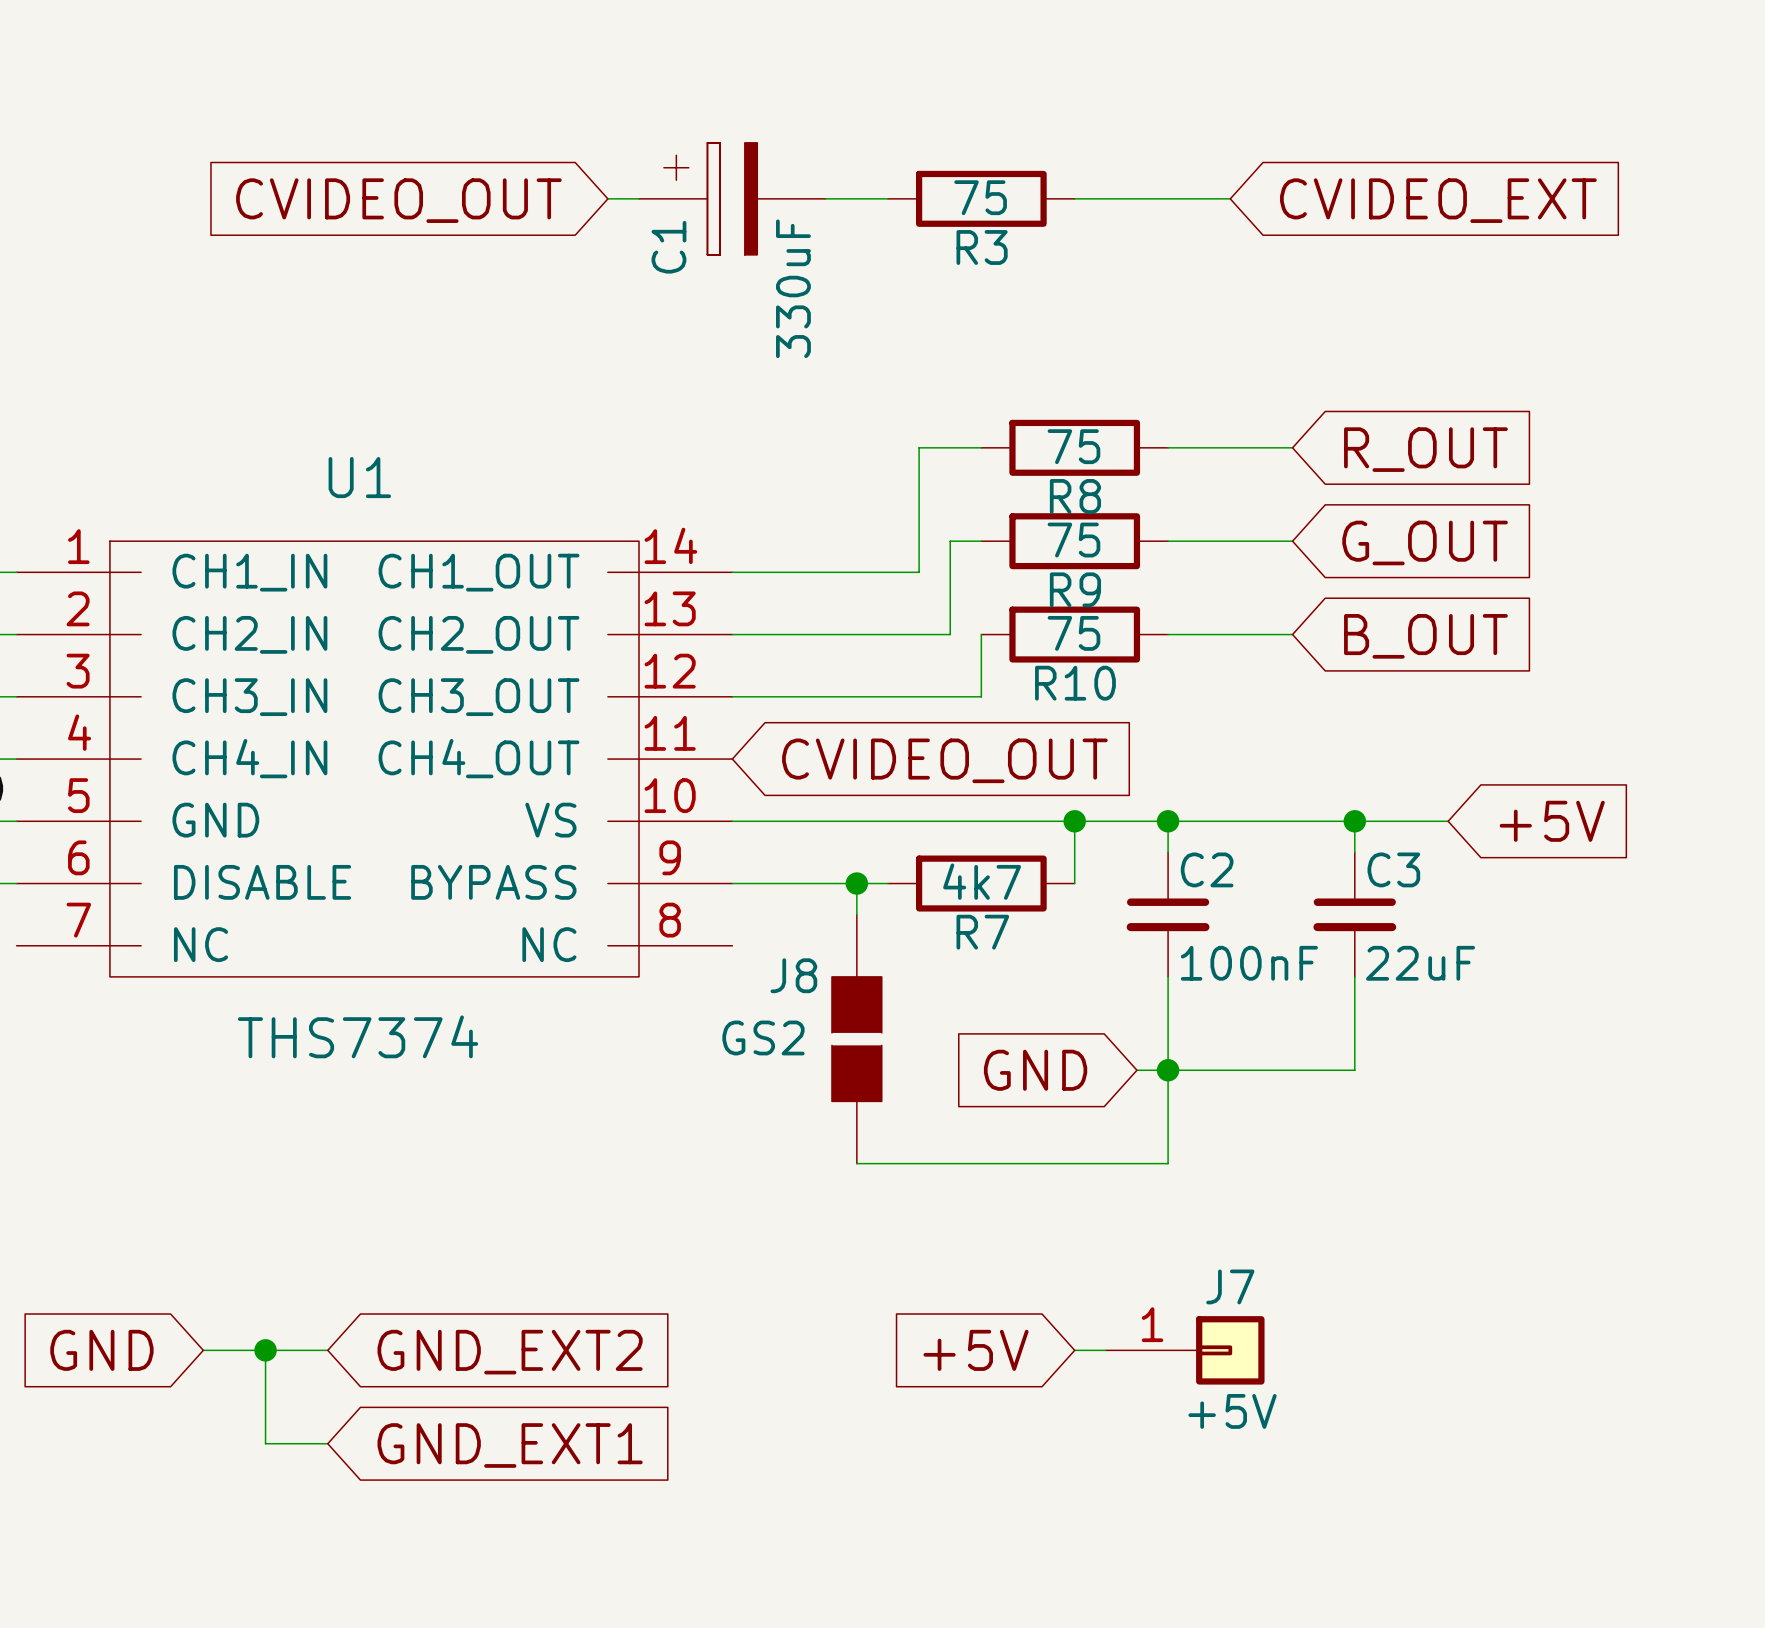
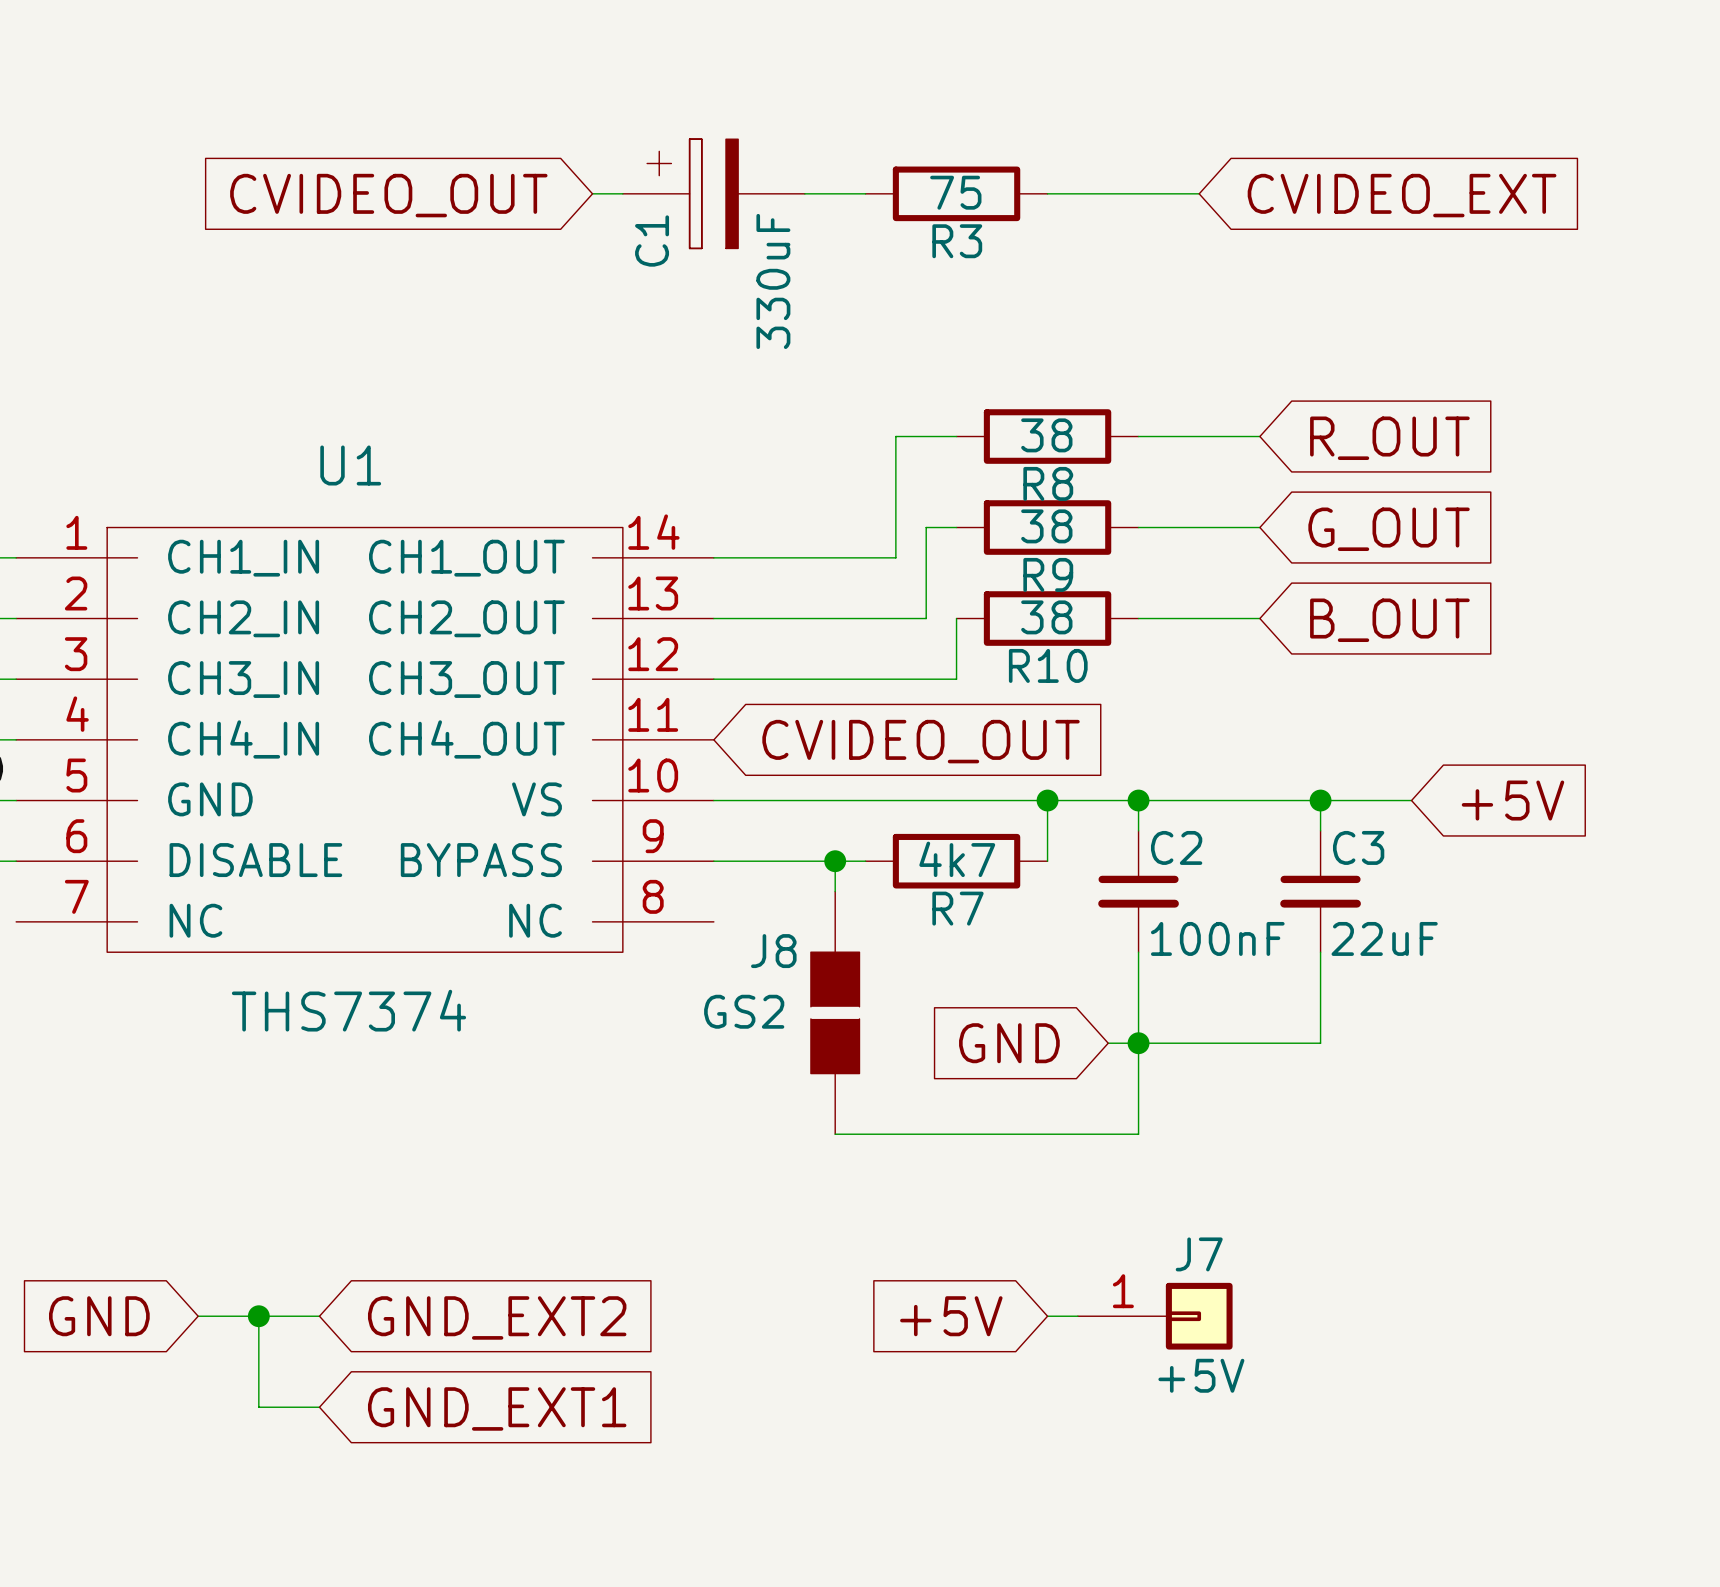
R8 value: 75 (1073, 446) -> 38 (1046, 435)
R9 value: 75 (1073, 540) -> 38 (1046, 526)
R10 value: 75 (1073, 633) -> 38 (1046, 617)

